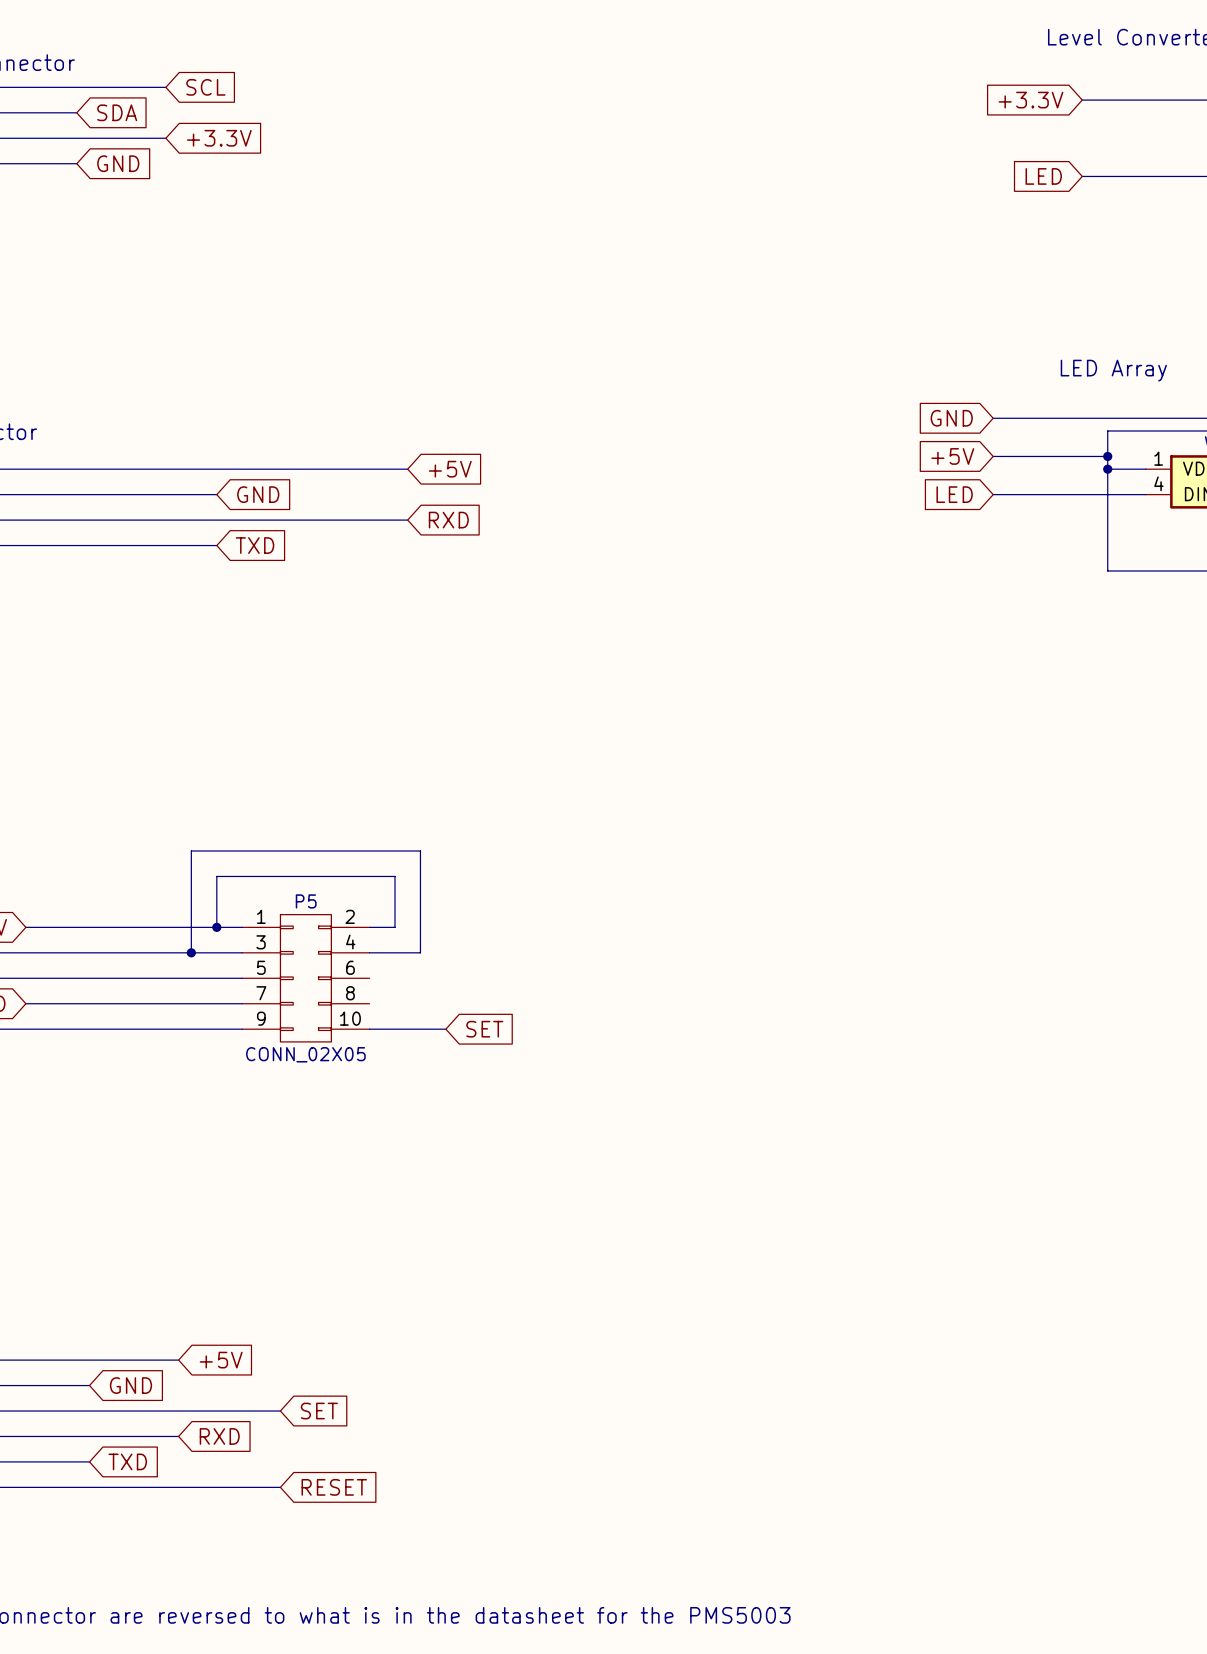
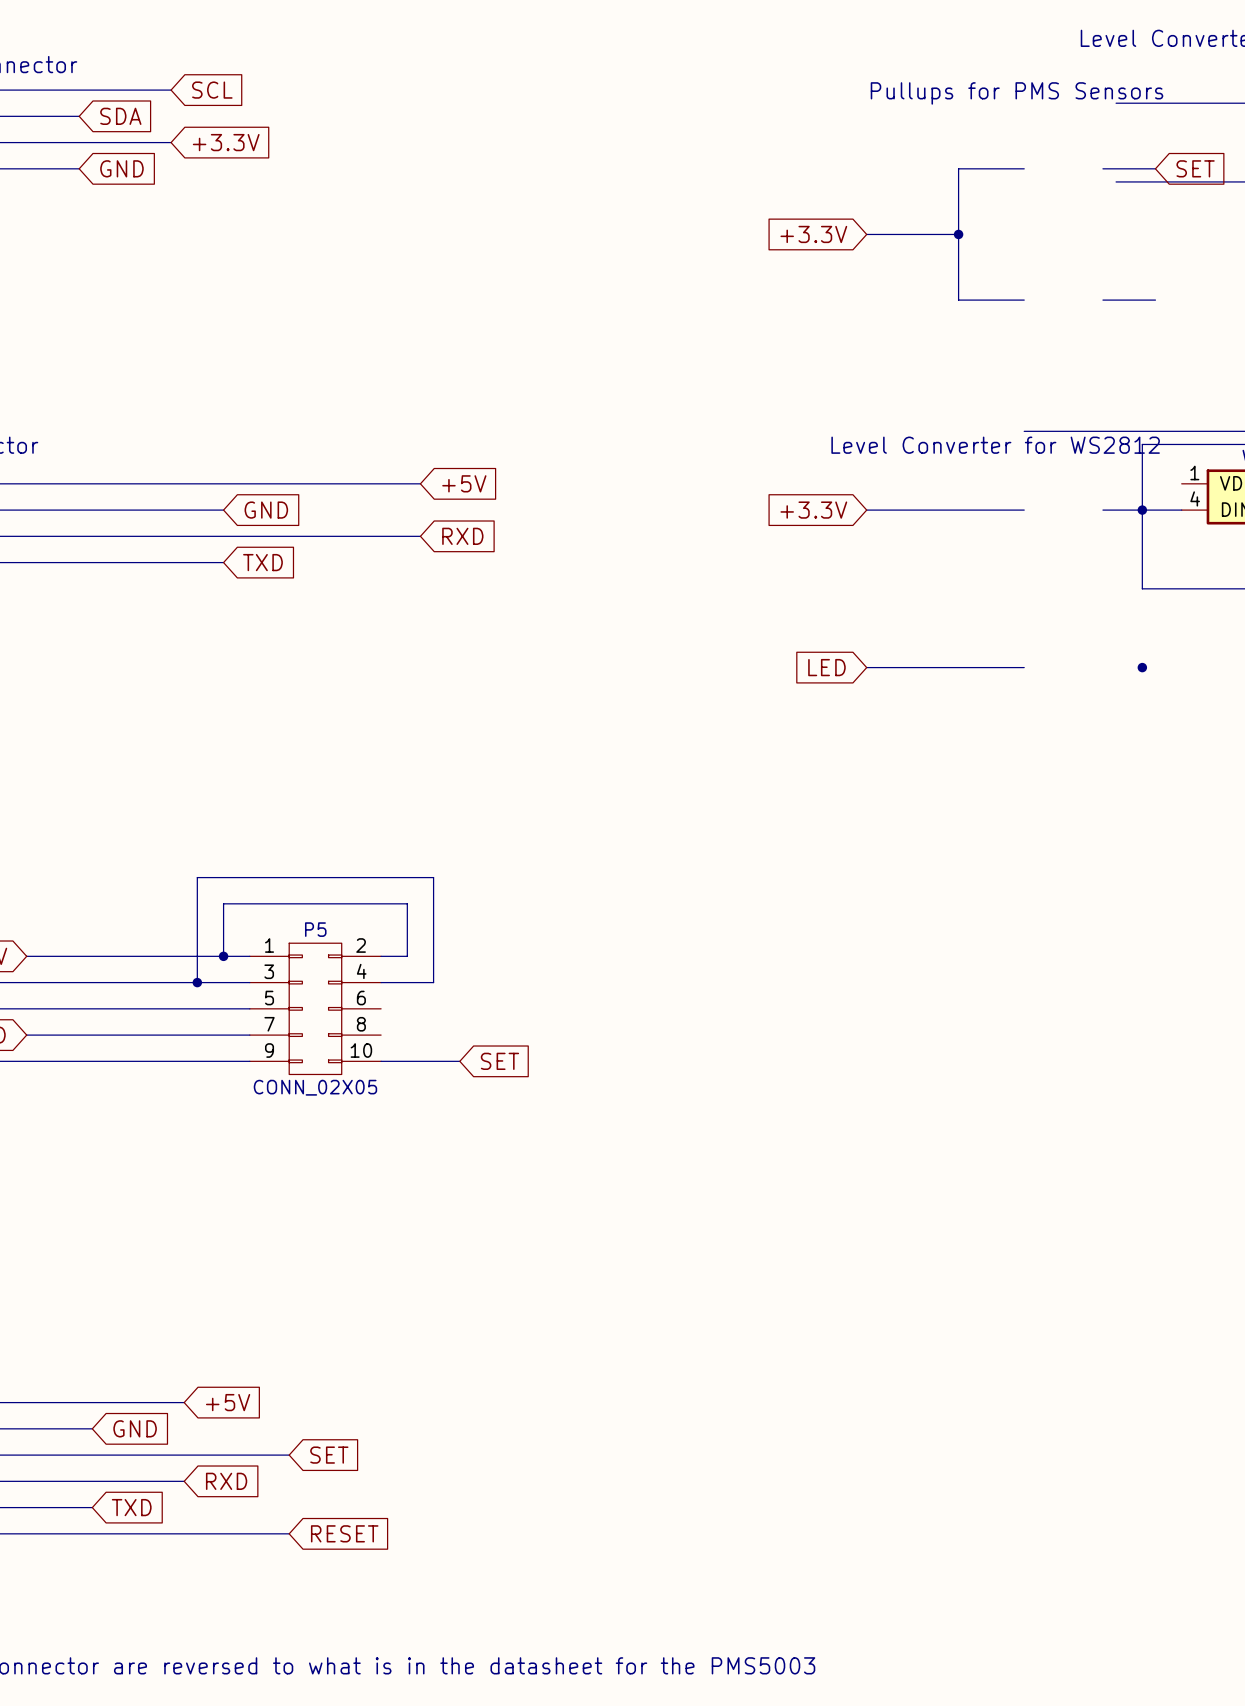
text: none -> Pullups for PMS Sensors (1017, 93)
global label: +3.3V (1031, 100) -> none
wire: none -> (1024, 168) (958, 168) (958, 300) (1024, 300)
wire: none -> (1102, 168) (1155, 168)
global label: none -> SET (1195, 168)
global label: LED (1043, 176) -> none
global label: none -> +3.3V (813, 234)
wire: none -> (866, 234) (958, 234)
junction: none -> (958, 234)
wire: none -> (1102, 300) (1155, 300)
text: LED Array (1113, 370) -> none
global label: GND (951, 418) -> none
text: none -> Level Converter for WS2812 (995, 445)
global label: +5V (952, 456) -> none
wire: (993, 456) (1107, 456) -> none
junction: (1107, 456) -> none
wire: (1107, 469) (1145, 469) -> none
junction: (1107, 469) -> none
global label: none -> +3.3V (813, 510)
global label position: LED (954, 494) -> LED (826, 667)
wire: (993, 494) (1069, 494) -> (1024, 510) (866, 510)
junction: none -> (1142, 510)
wire: none -> (866, 667) (1024, 667)
junction: none -> (1142, 667)

